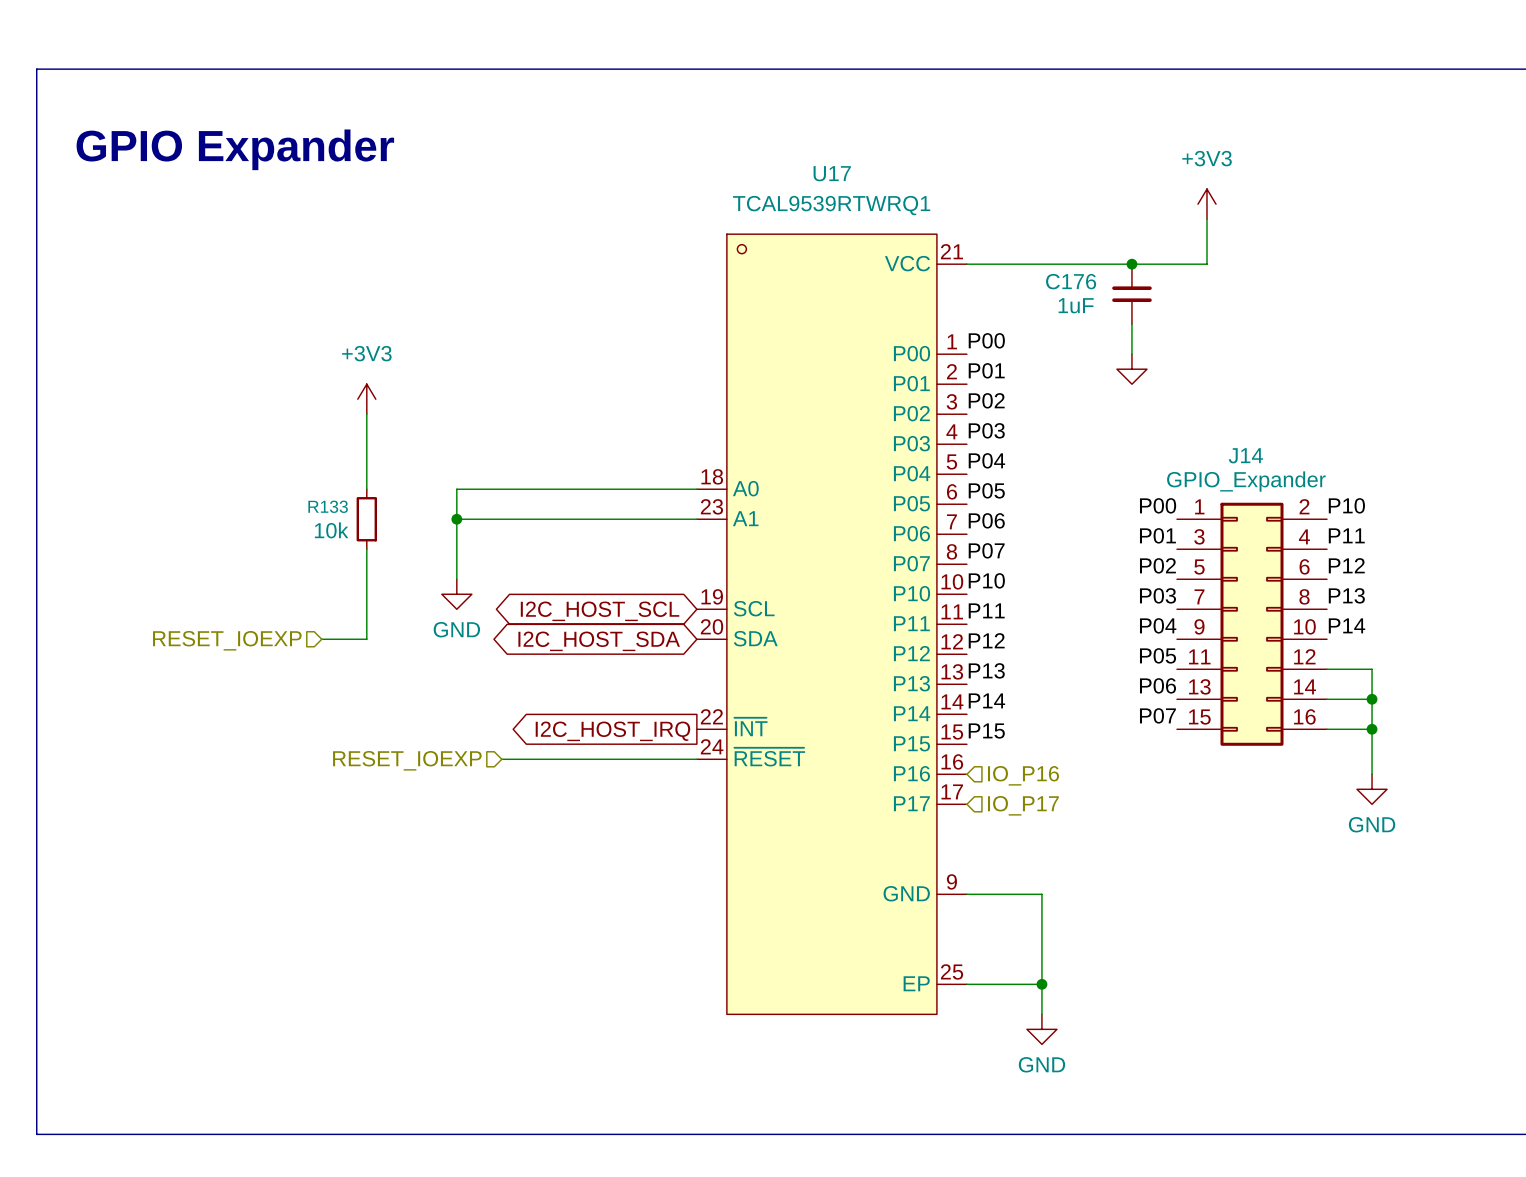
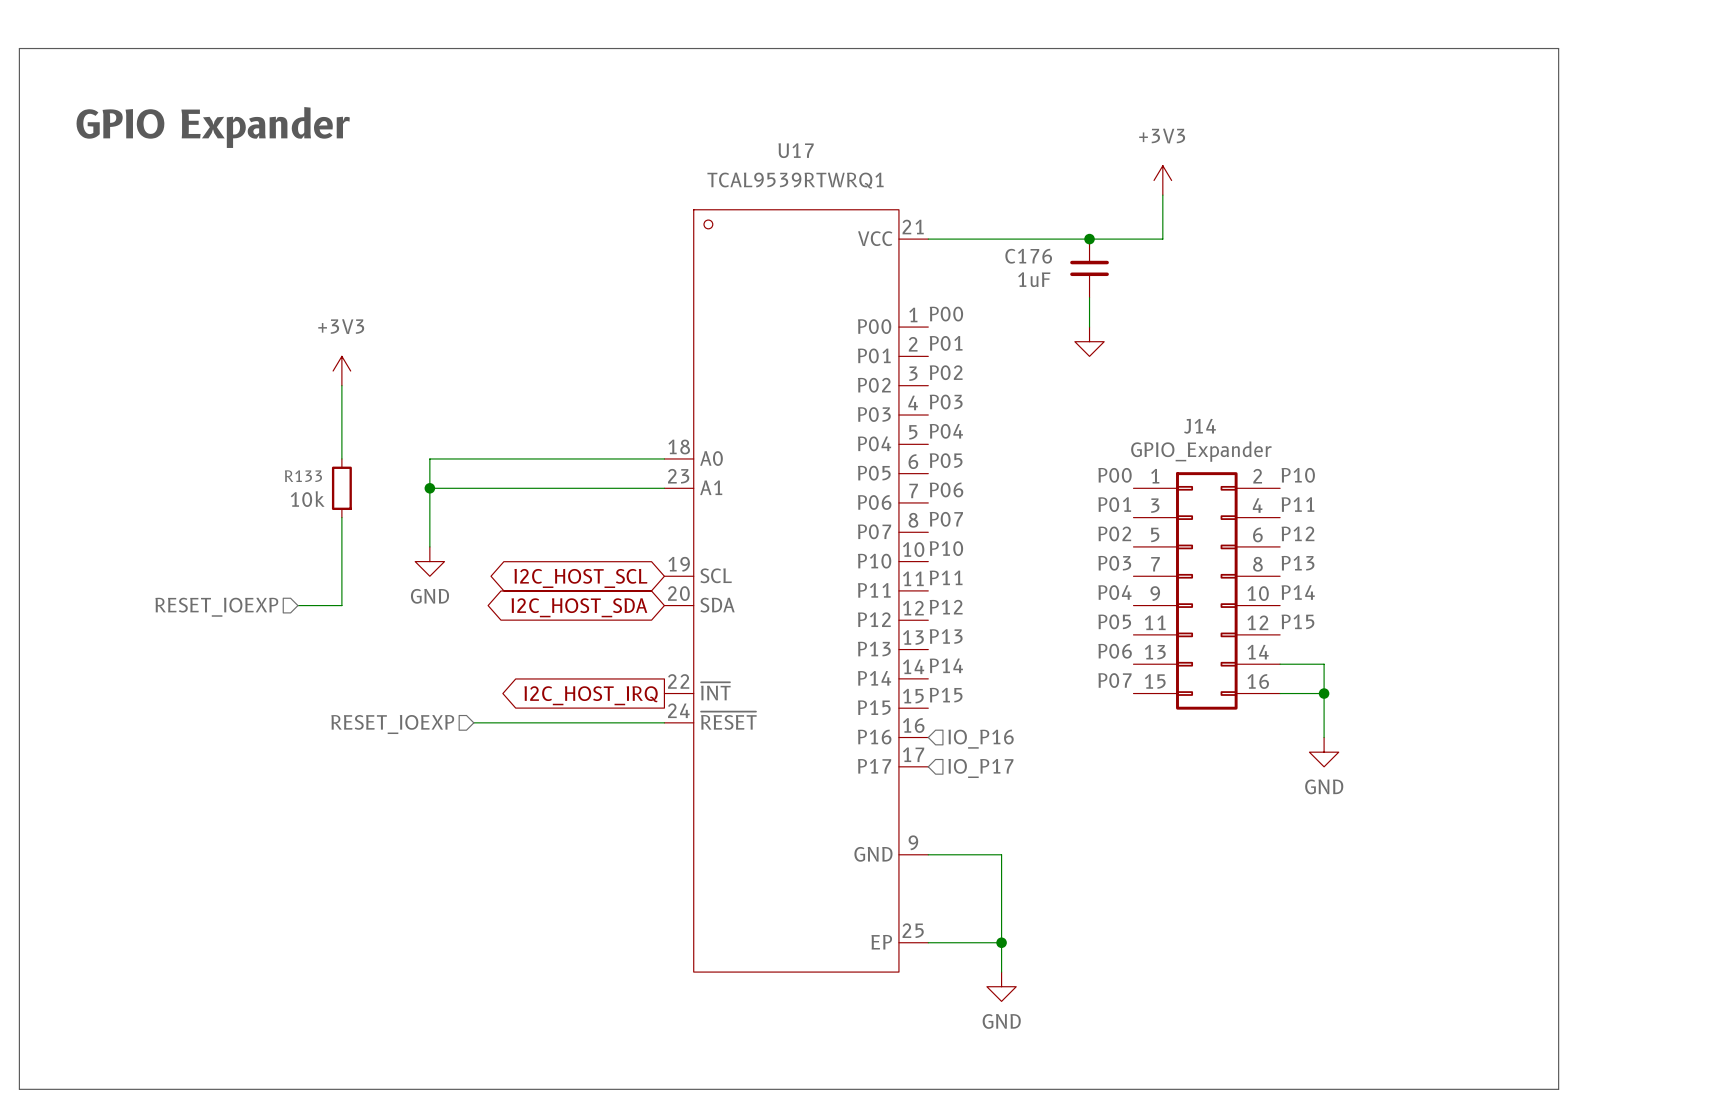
label: none -> P15 (1297, 621)
wire: (1327, 669) (1372, 669) (1372, 699) -> none
junction: (1372, 699) -> none

